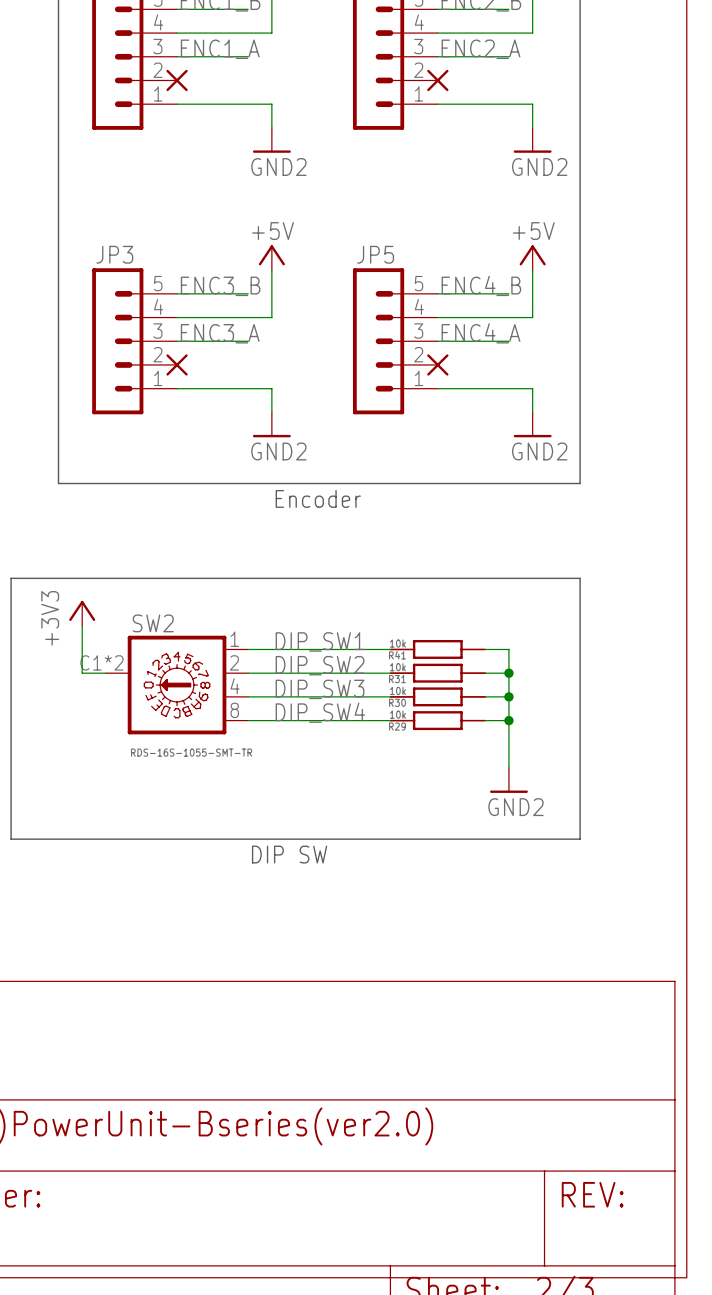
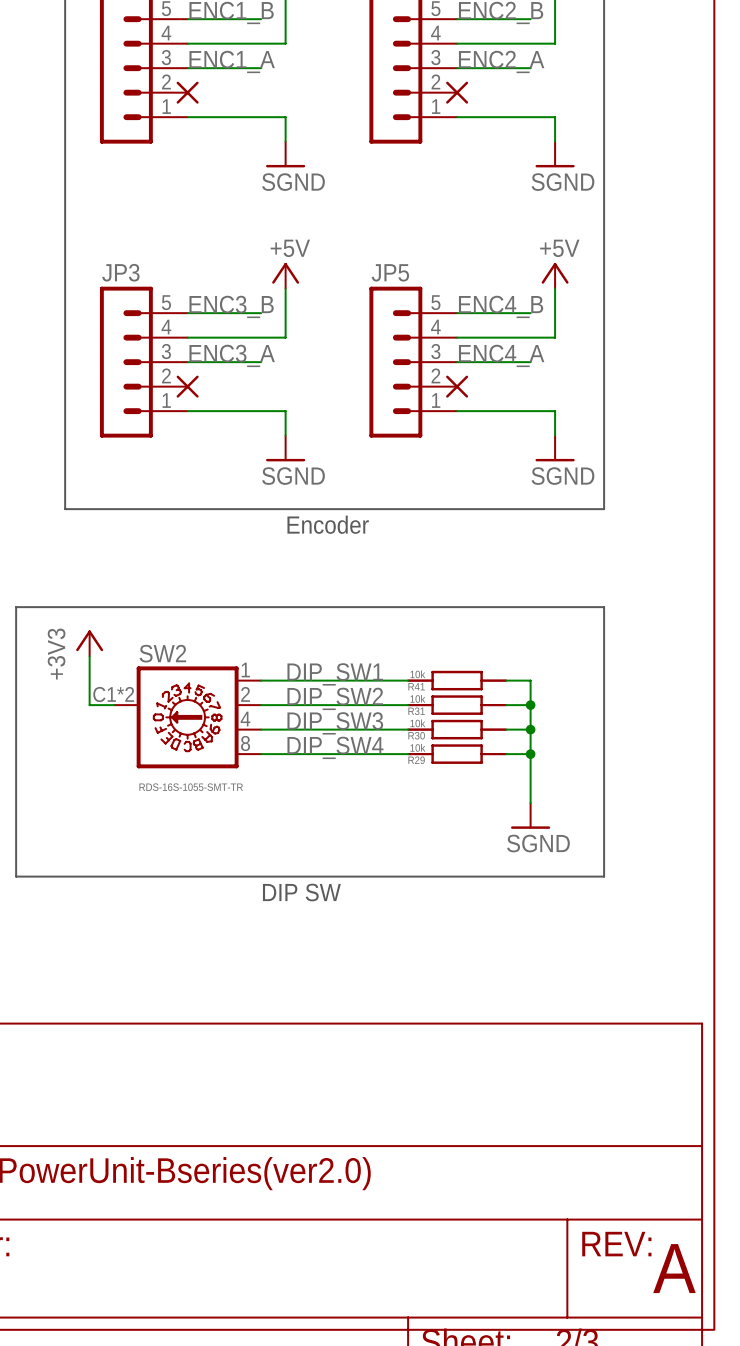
label: GND2 (278, 167) -> SGND (293, 182)
label: GND2 (539, 167) -> SGND (562, 182)
label: GND2 (278, 451) -> SGND (293, 476)
label: GND2 (539, 451) -> SGND (562, 476)
label: GND2 (515, 807) -> SGND (538, 843)
text: none -> A (674, 1268)

